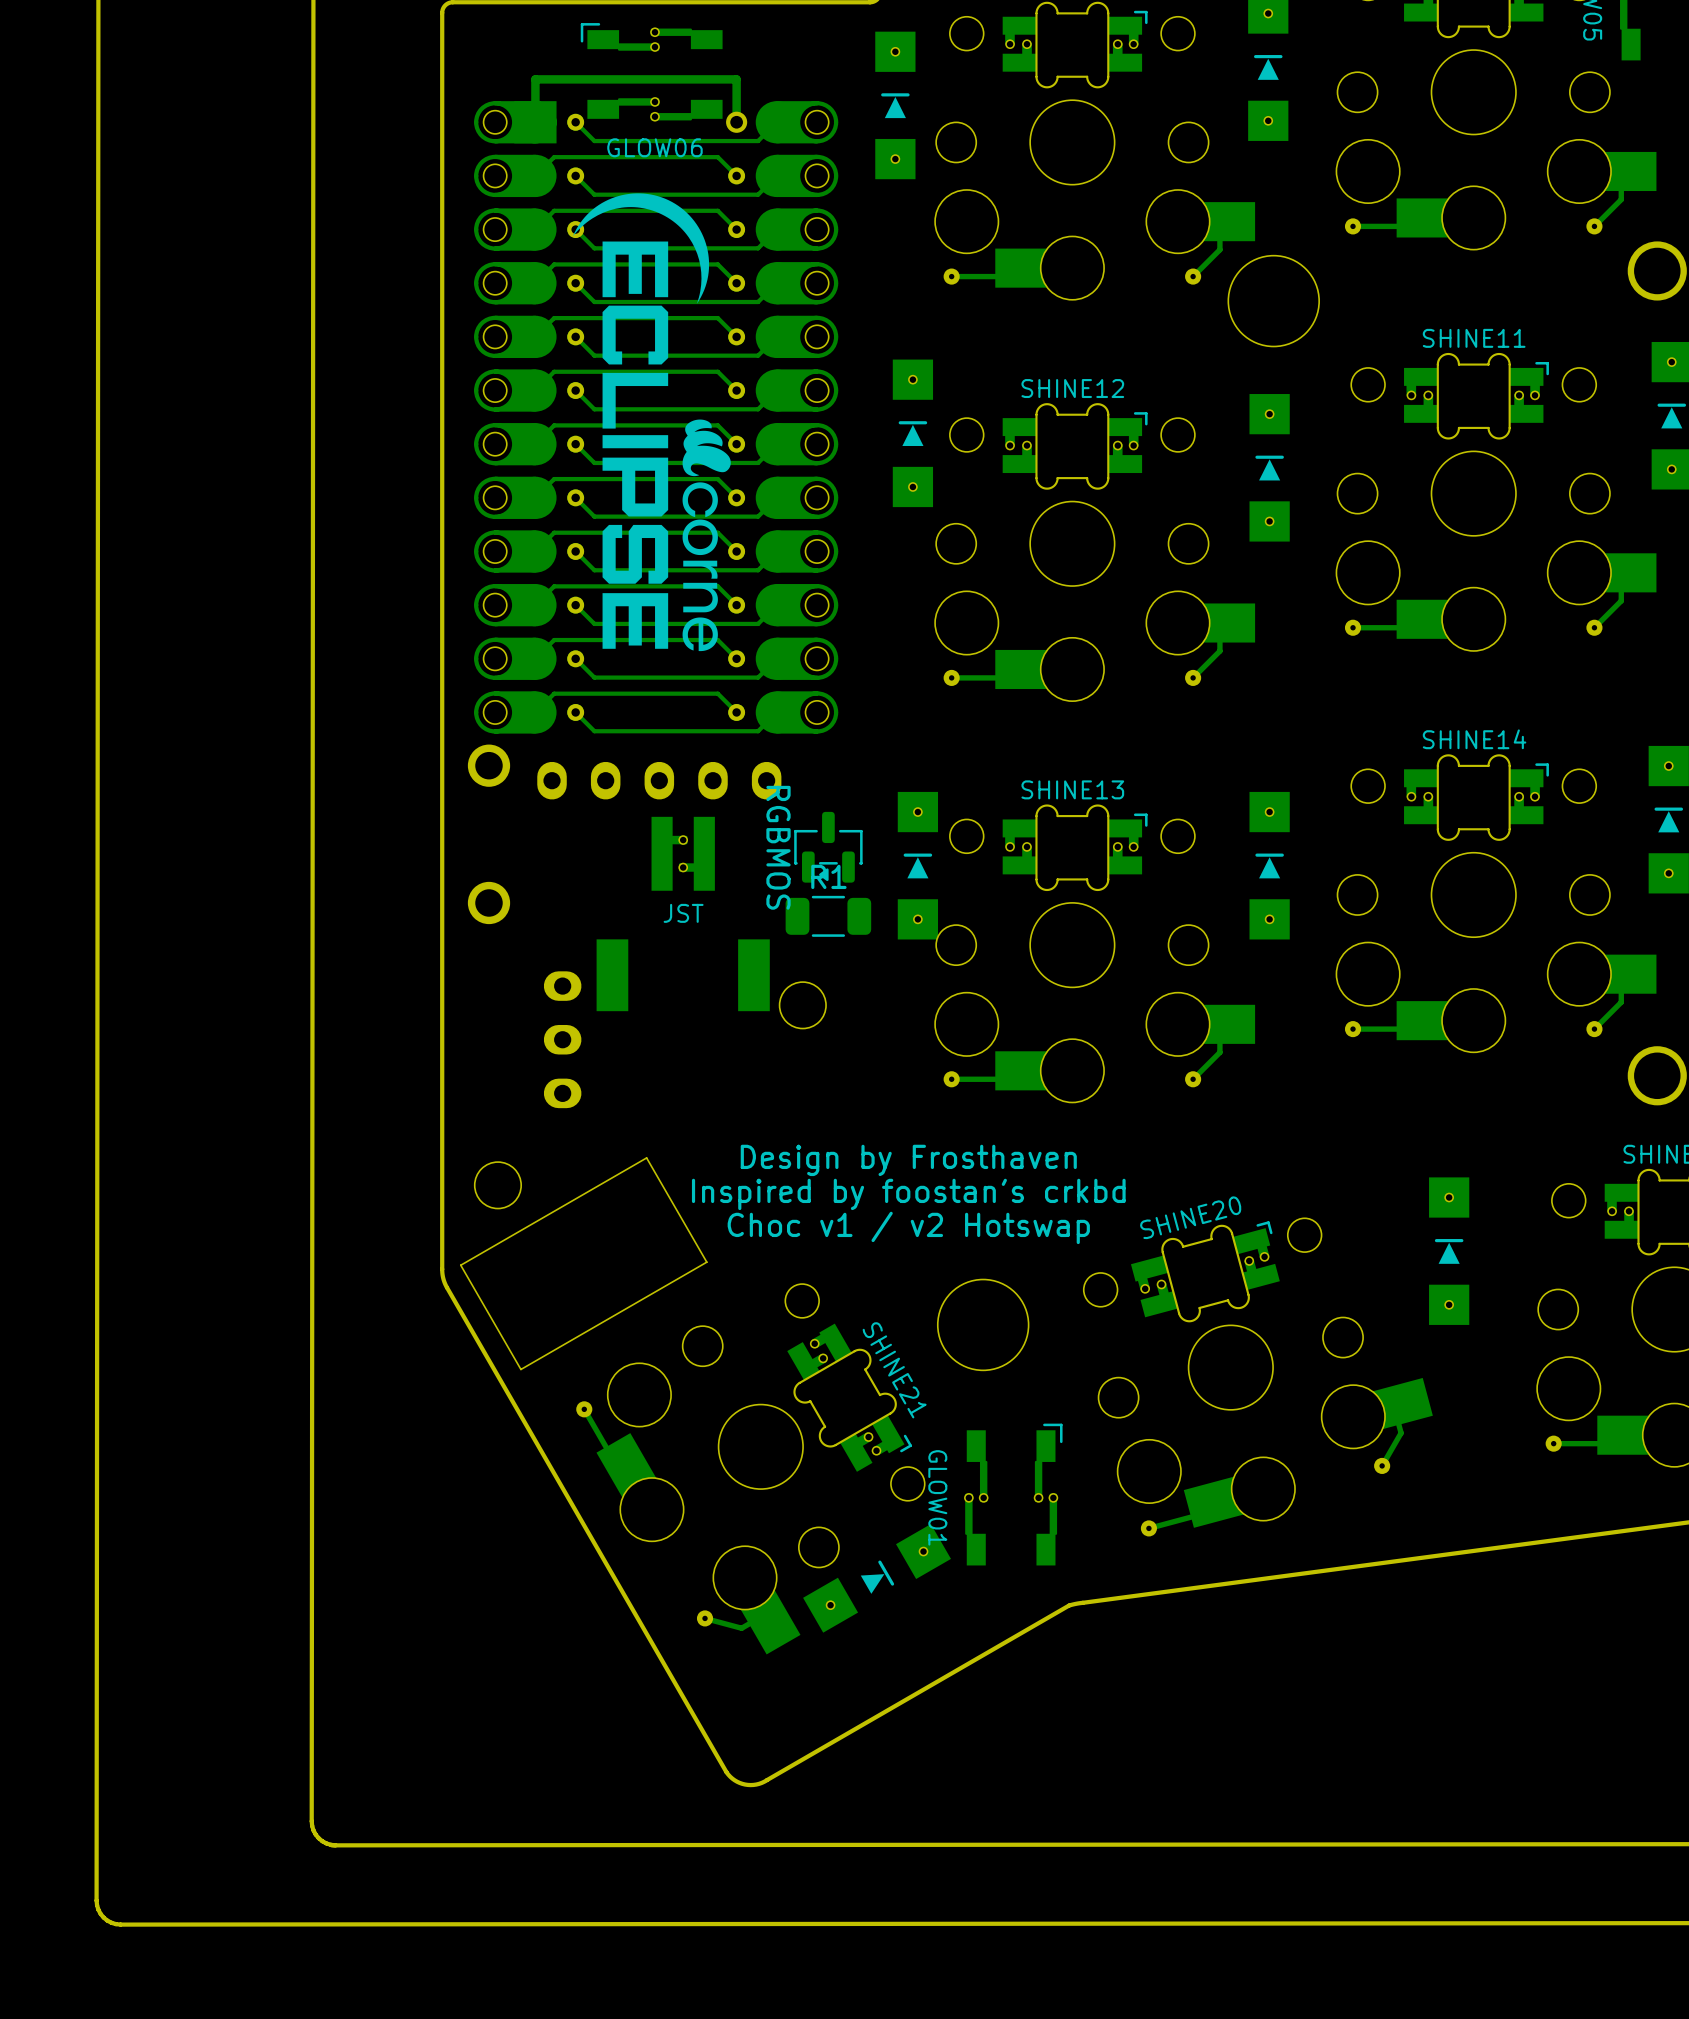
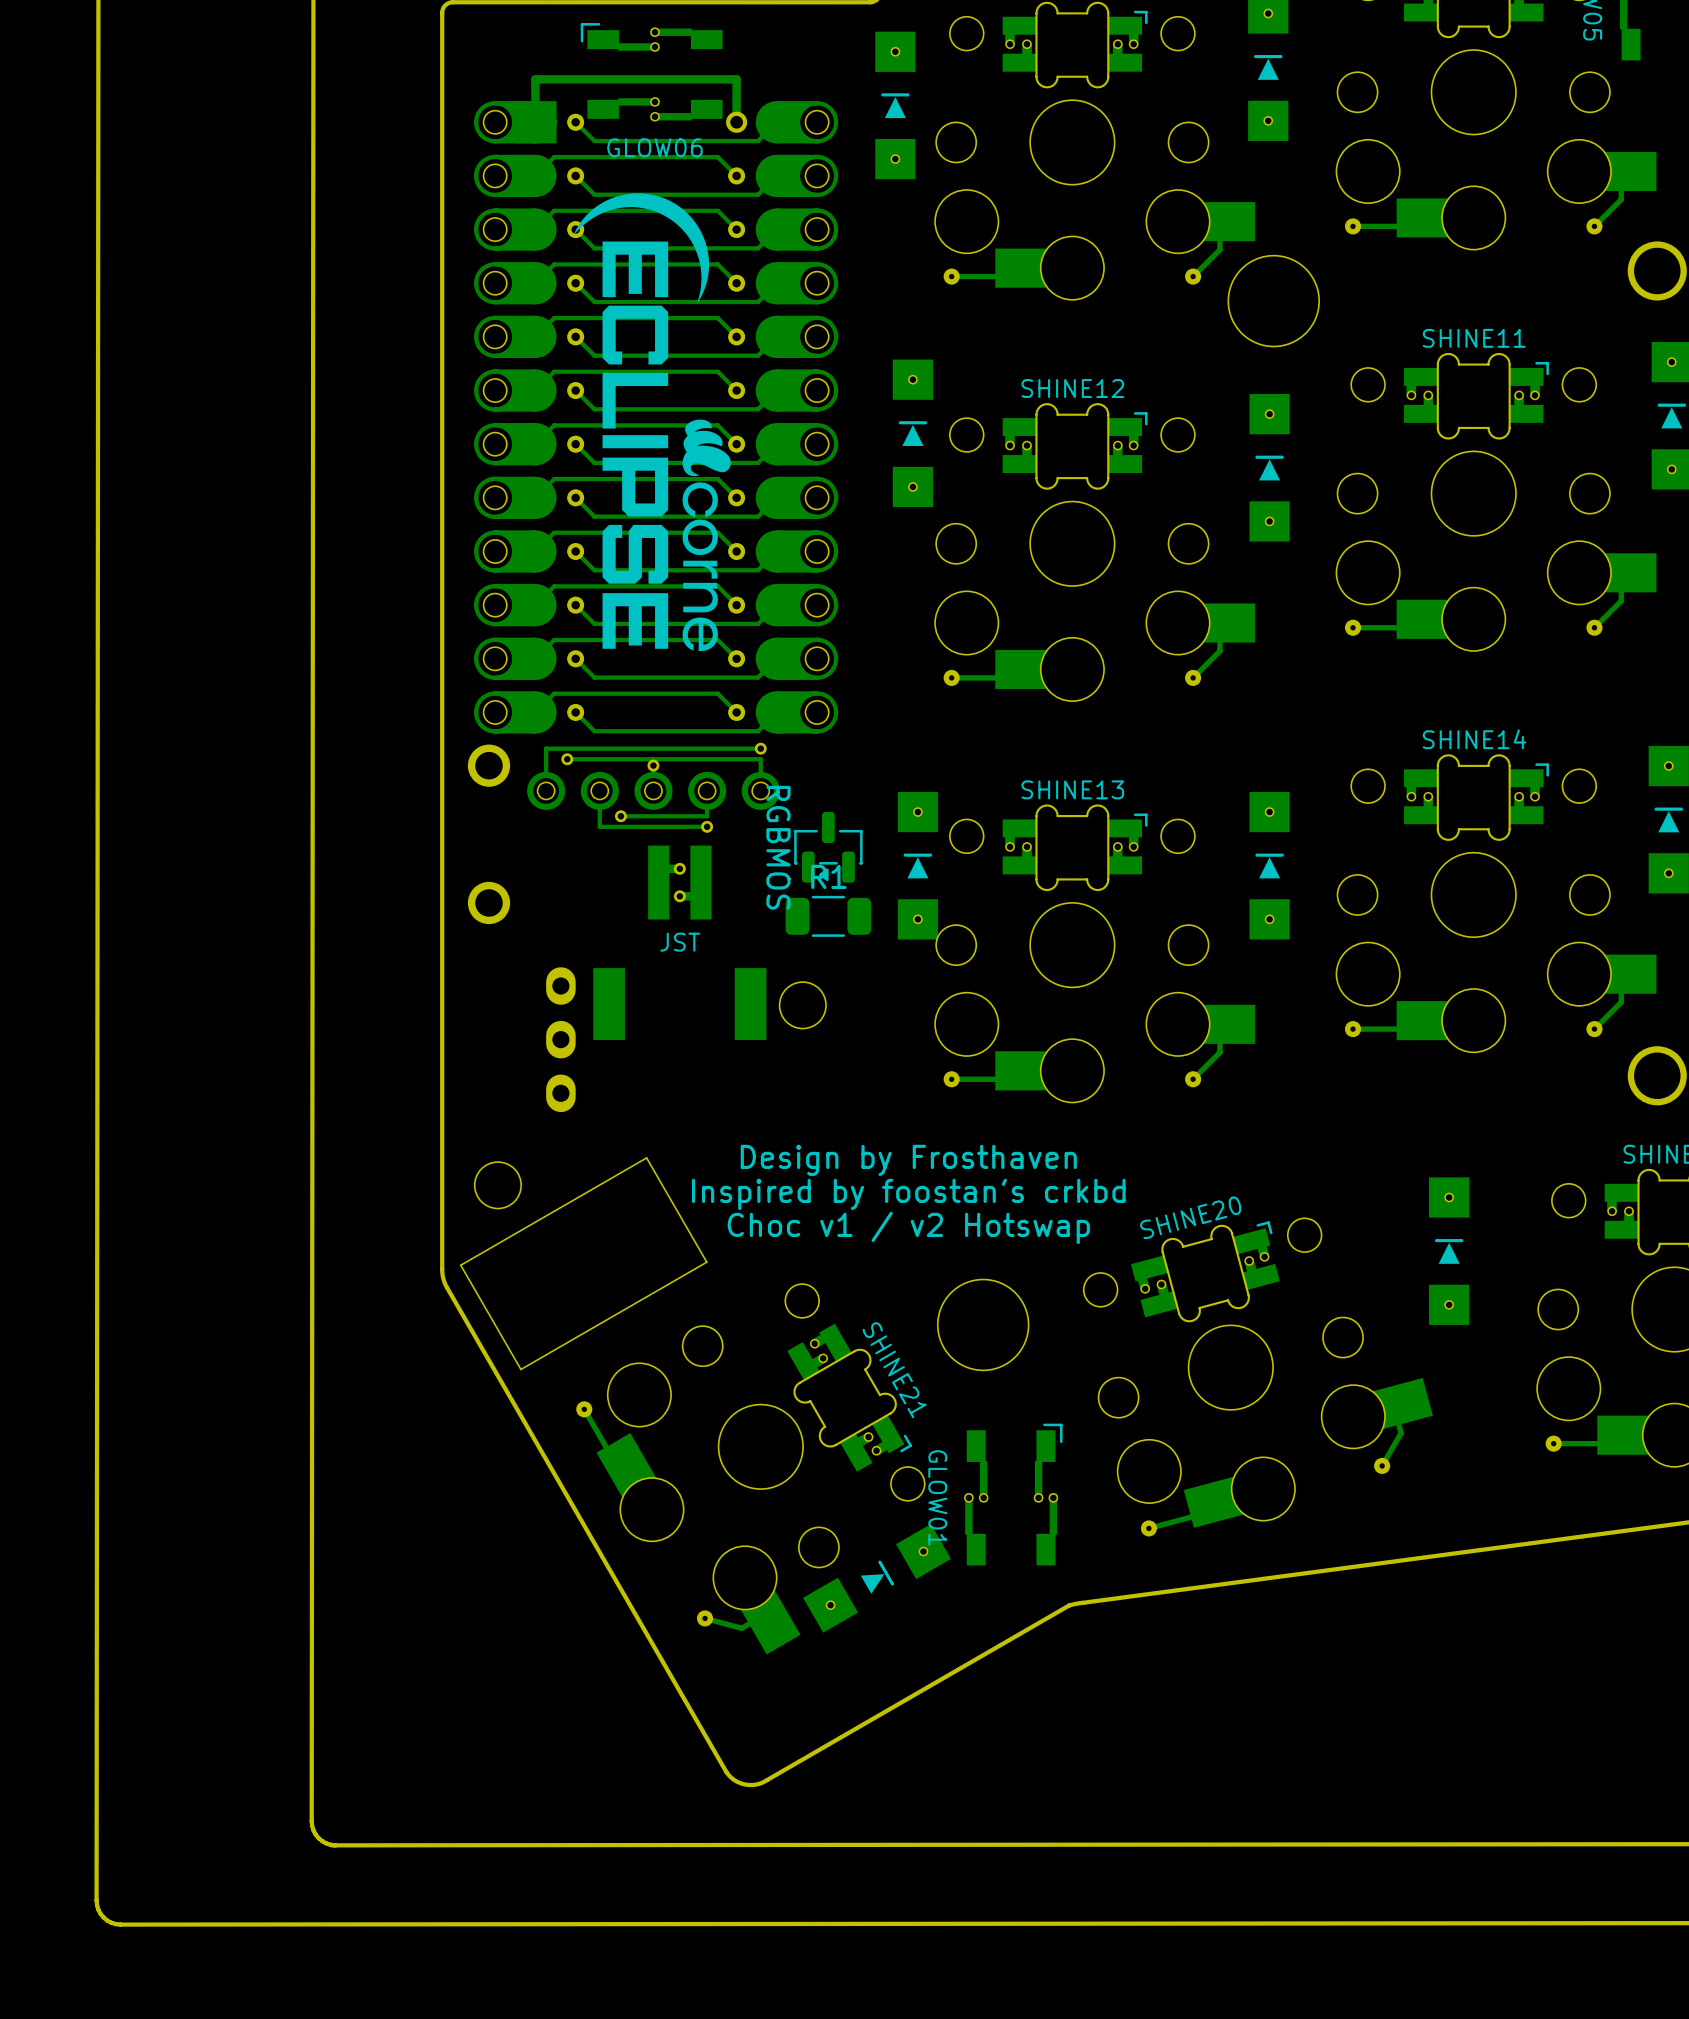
part footprint: [537, 761, 782, 800] -> [527, 742, 780, 833]
JST: (683, 914) -> none
JST: none -> (679, 942)
part footprint: [543, 971, 582, 1109] -> [546, 967, 576, 1113]

